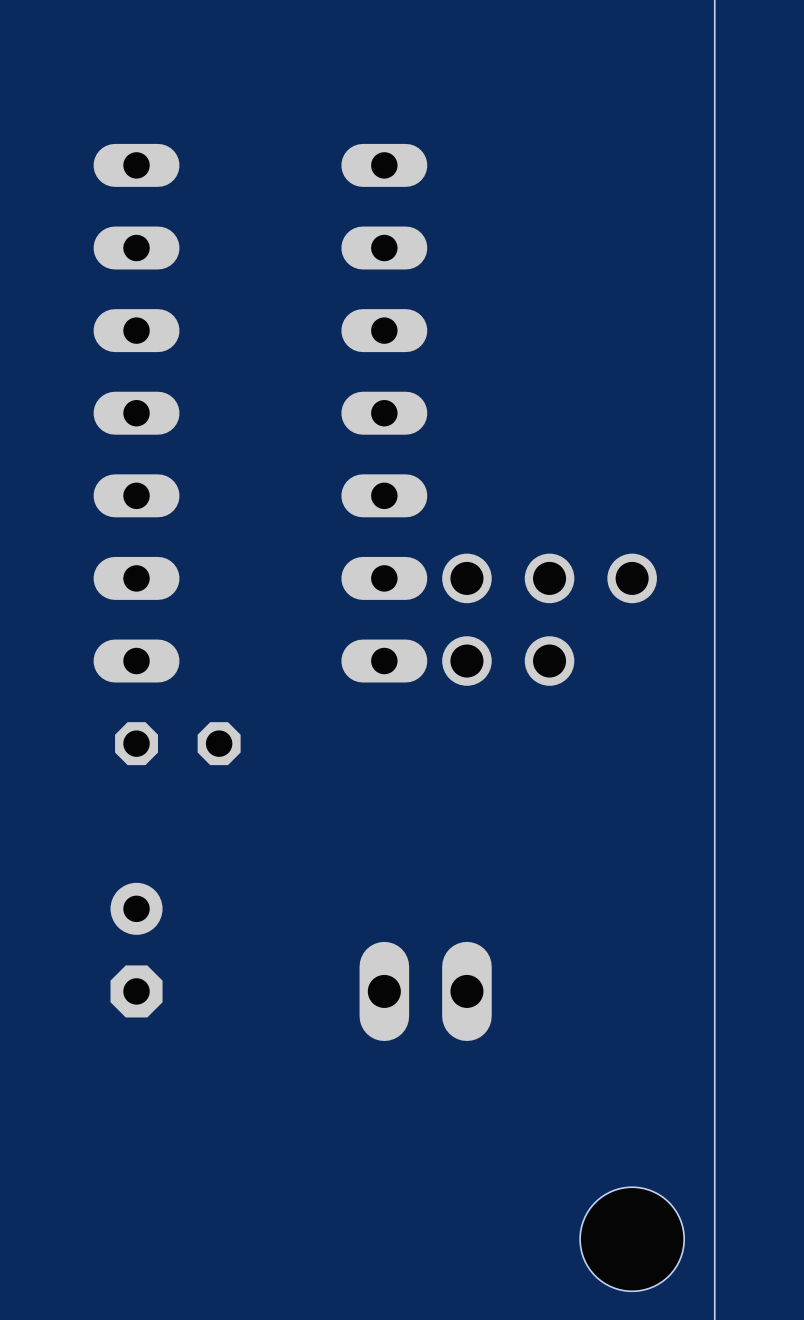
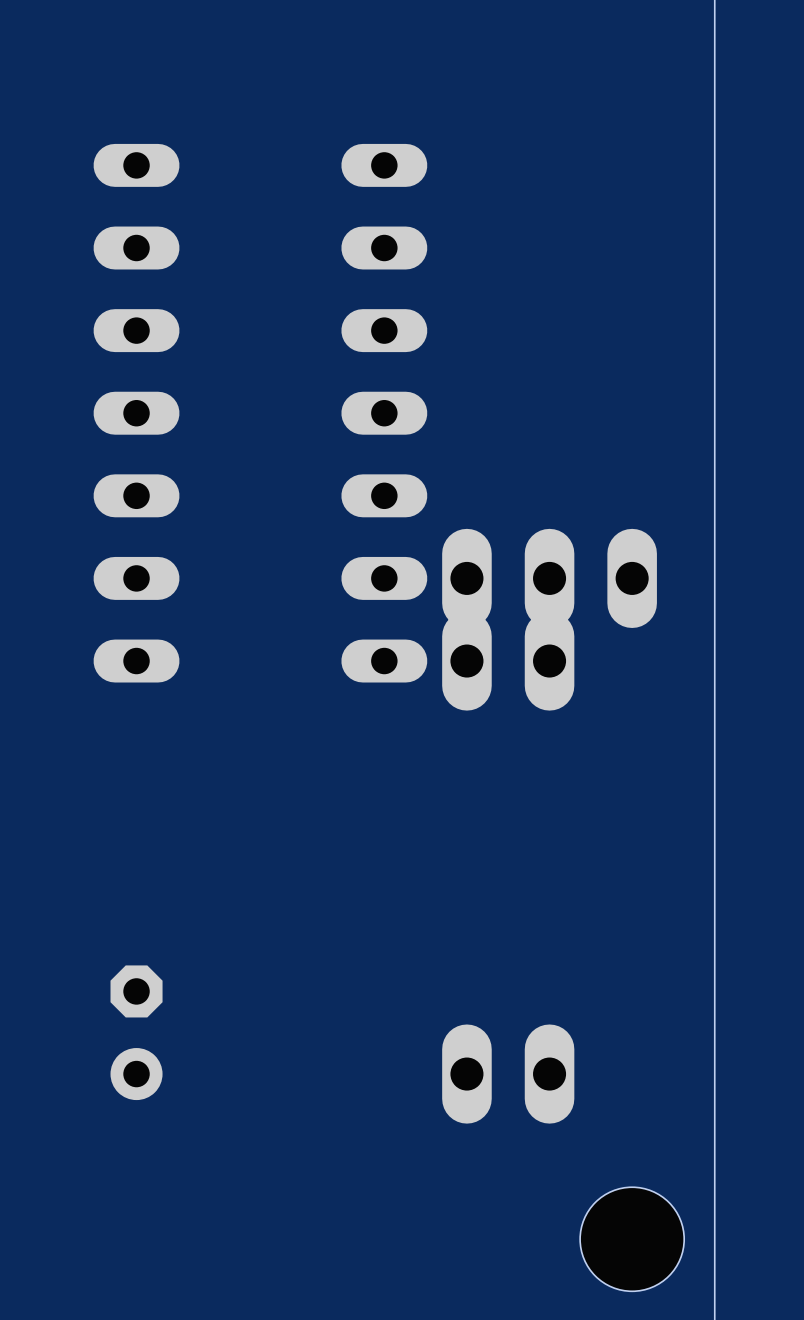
part footprint: [442, 553, 657, 604] -> [442, 528, 657, 628]
part footprint: [442, 636, 575, 686] -> [442, 611, 575, 711]
part: (177, 743) -> none
part rotation: 0° (136, 950) -> 180° (136, 1032)
part position: (136, 950) -> (136, 1032)
part position: (425, 991) -> (508, 1074)

